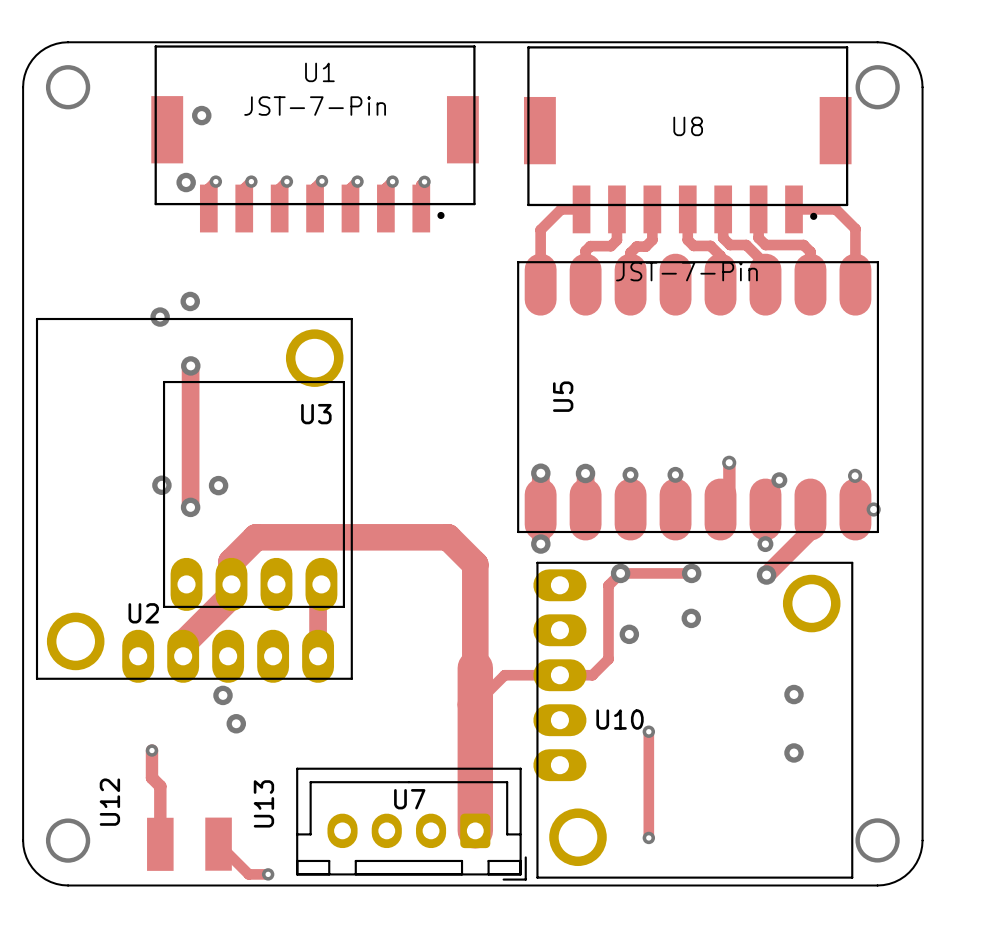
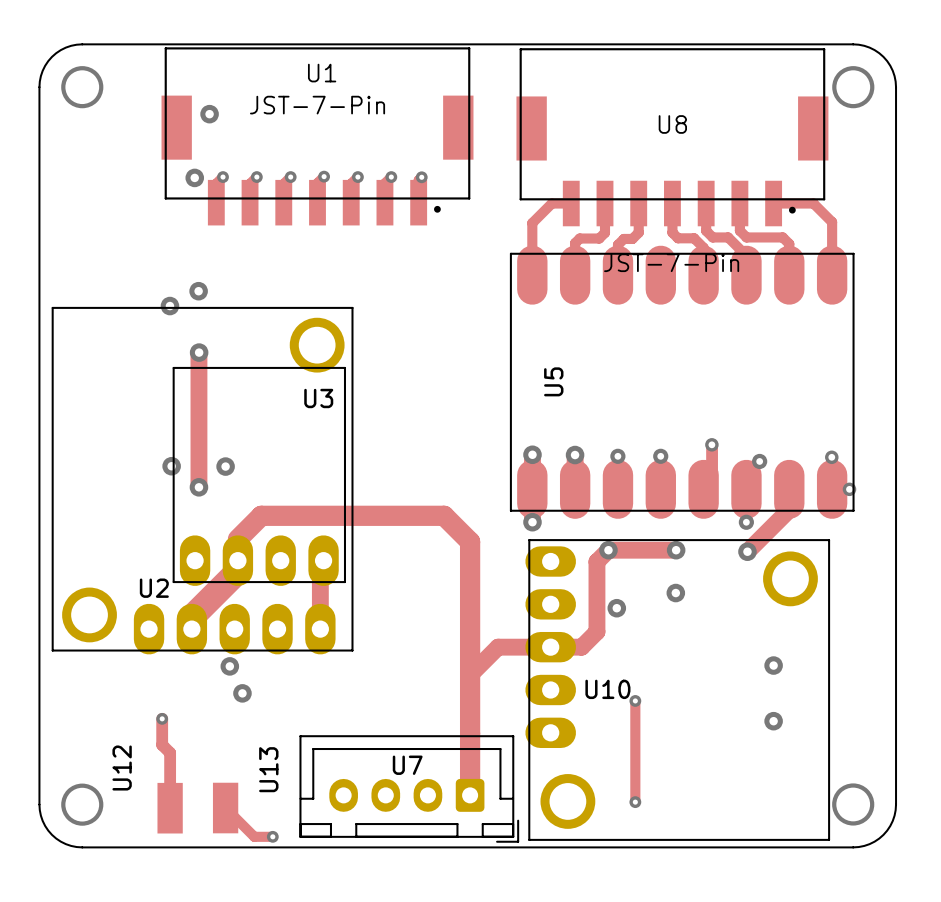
track width: thin (691, 573) (620, 573) (608, 585) (608, 659) (592, 675) (504, 675) (475, 704) -> thick (676, 550) (608, 550) (596, 561) (596, 631) (581, 647) (498, 647) (470, 675)
track width: thick (231, 584) (231, 561) (256, 537) (448, 537) (475, 564) (475, 830) -> thin (237, 560) (237, 539) (261, 515) (444, 515) (470, 541) (470, 795)

